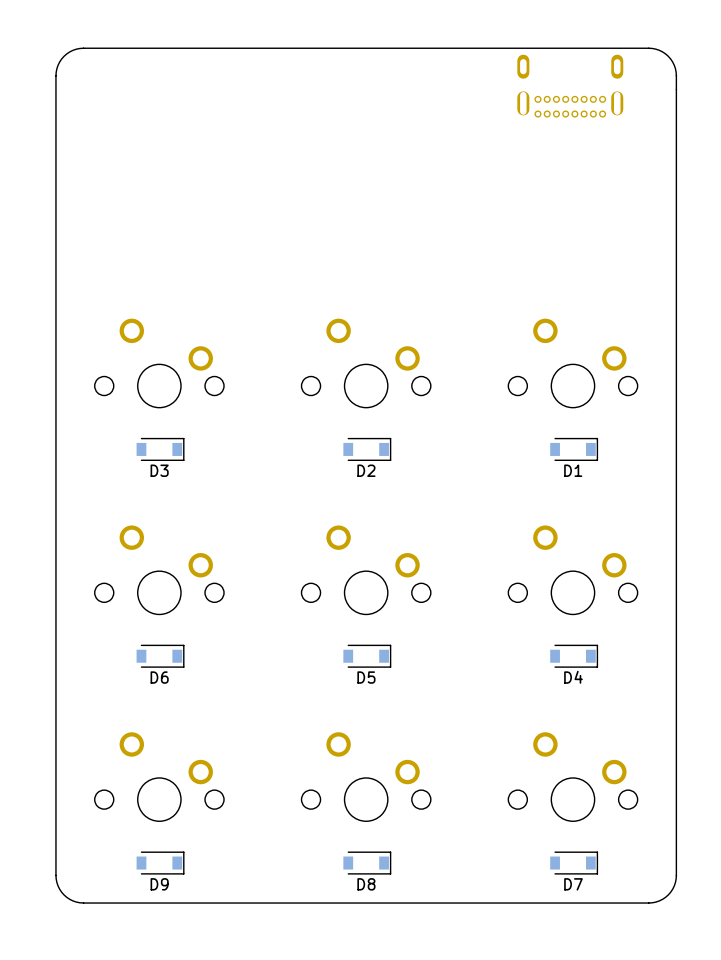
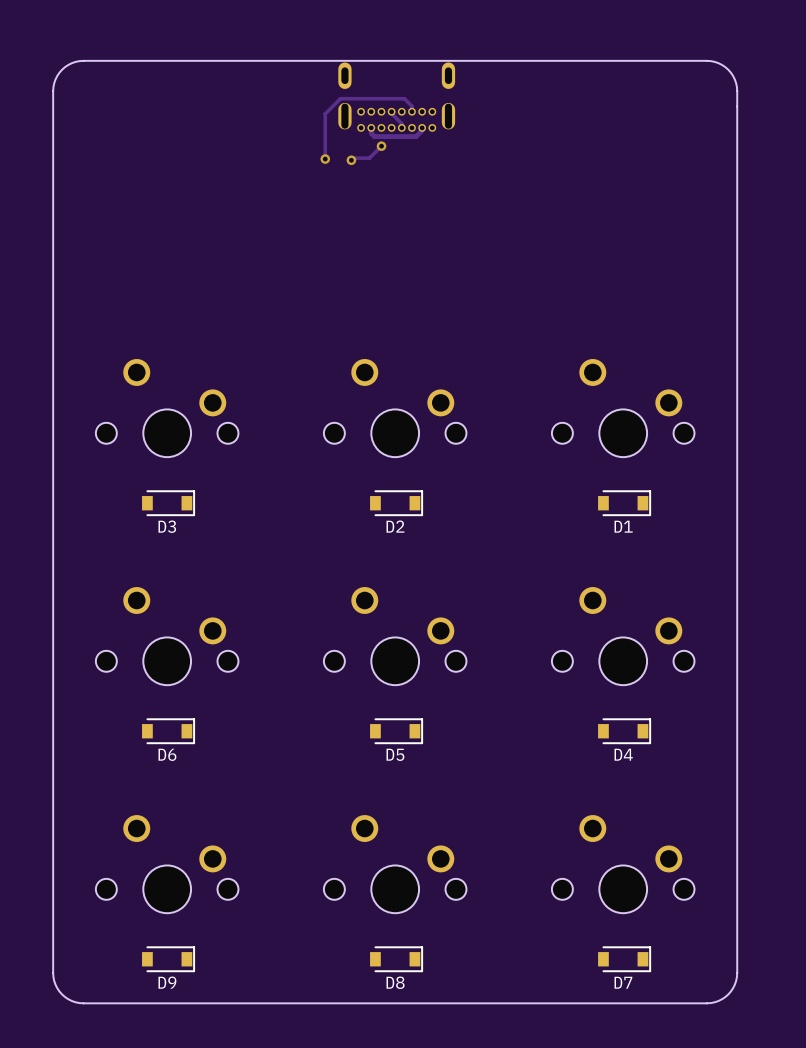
part position: (570, 86) -> (396, 97)
track: none -> (391, 111) (401, 123) (401, 127)
track: none -> (411, 111) (411, 106) (404, 98) (340, 98) (325, 113) (325, 159)
track: none -> (371, 127) (371, 133) (374, 136) (416, 136) (421, 130)
track: none -> (381, 146) (369, 158) (353, 158) (351, 160)
via: none -> (381, 146)
via: none -> (325, 159)
via: none -> (351, 160)

